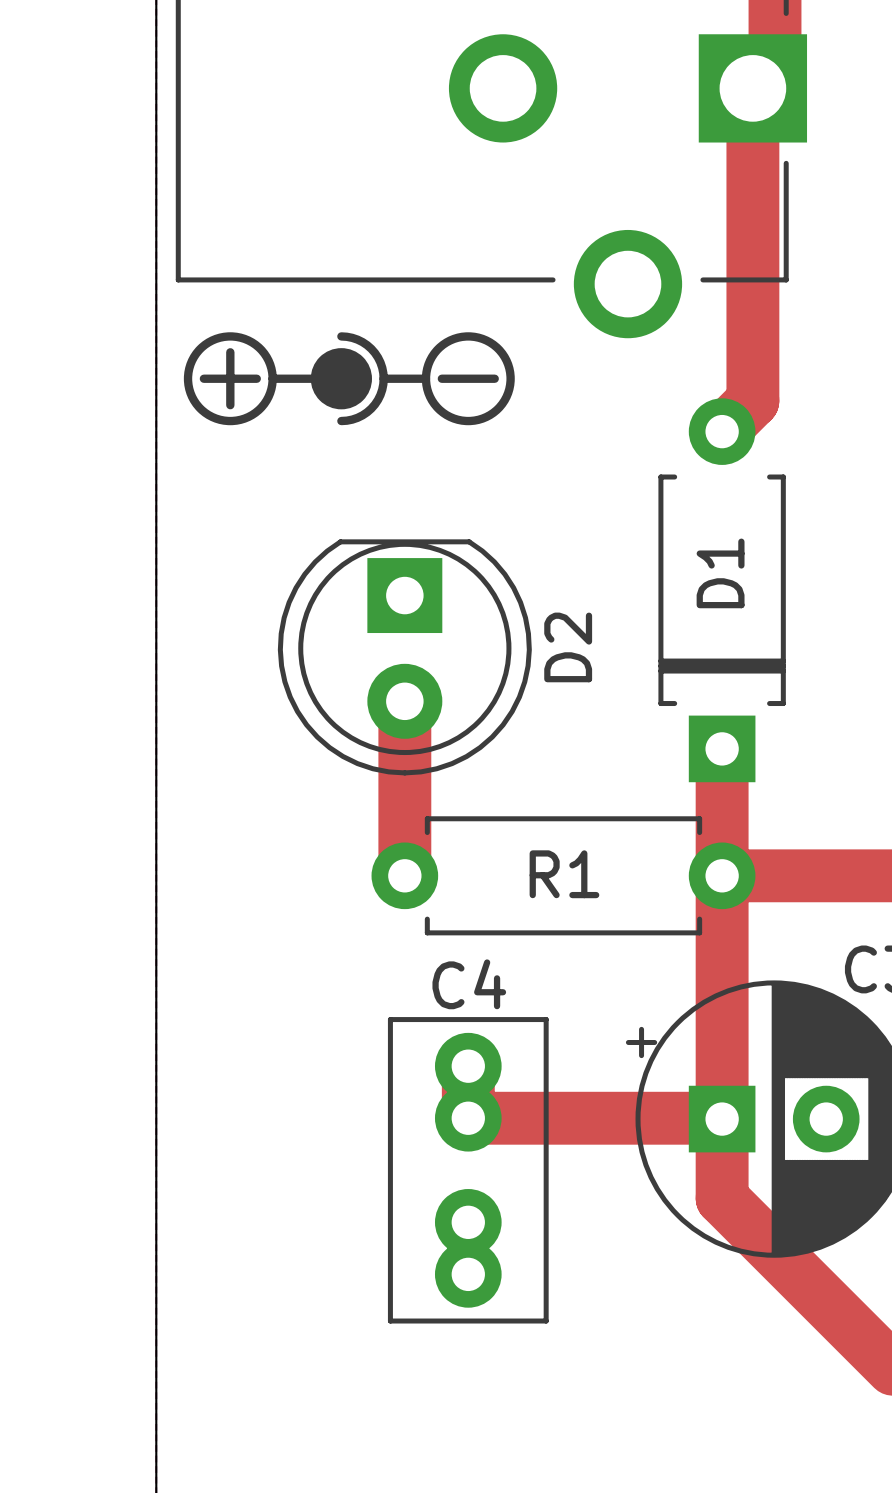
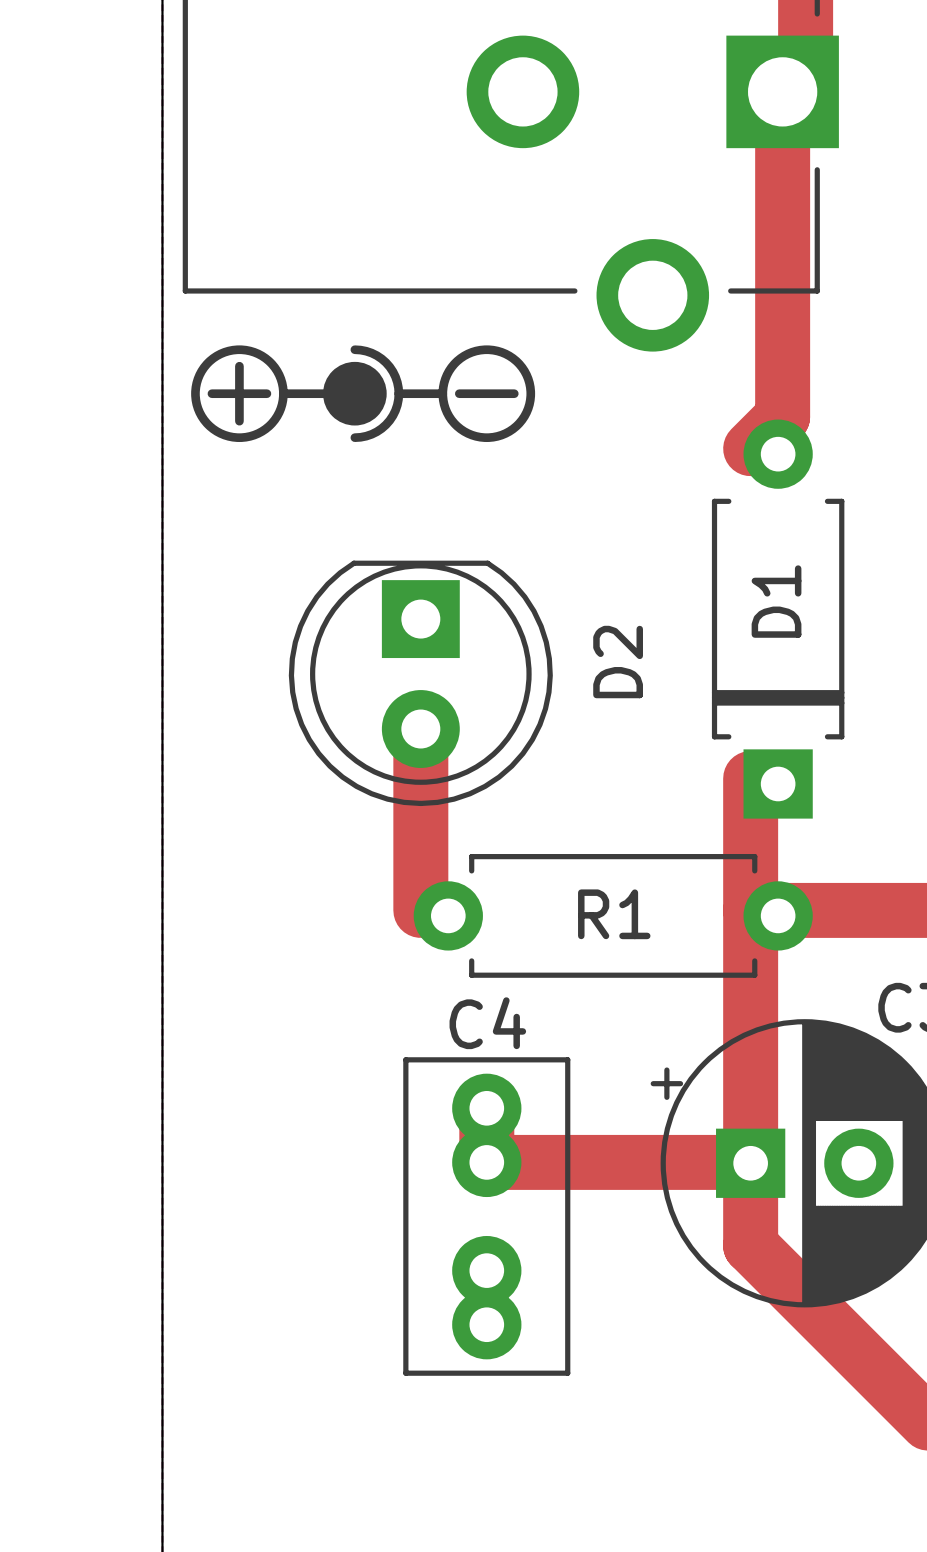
D1 position: (722, 590) -> (778, 619)
D2 name position: D2 (568, 647) -> D2 (618, 662)
R1 position: (563, 875) -> (613, 915)

